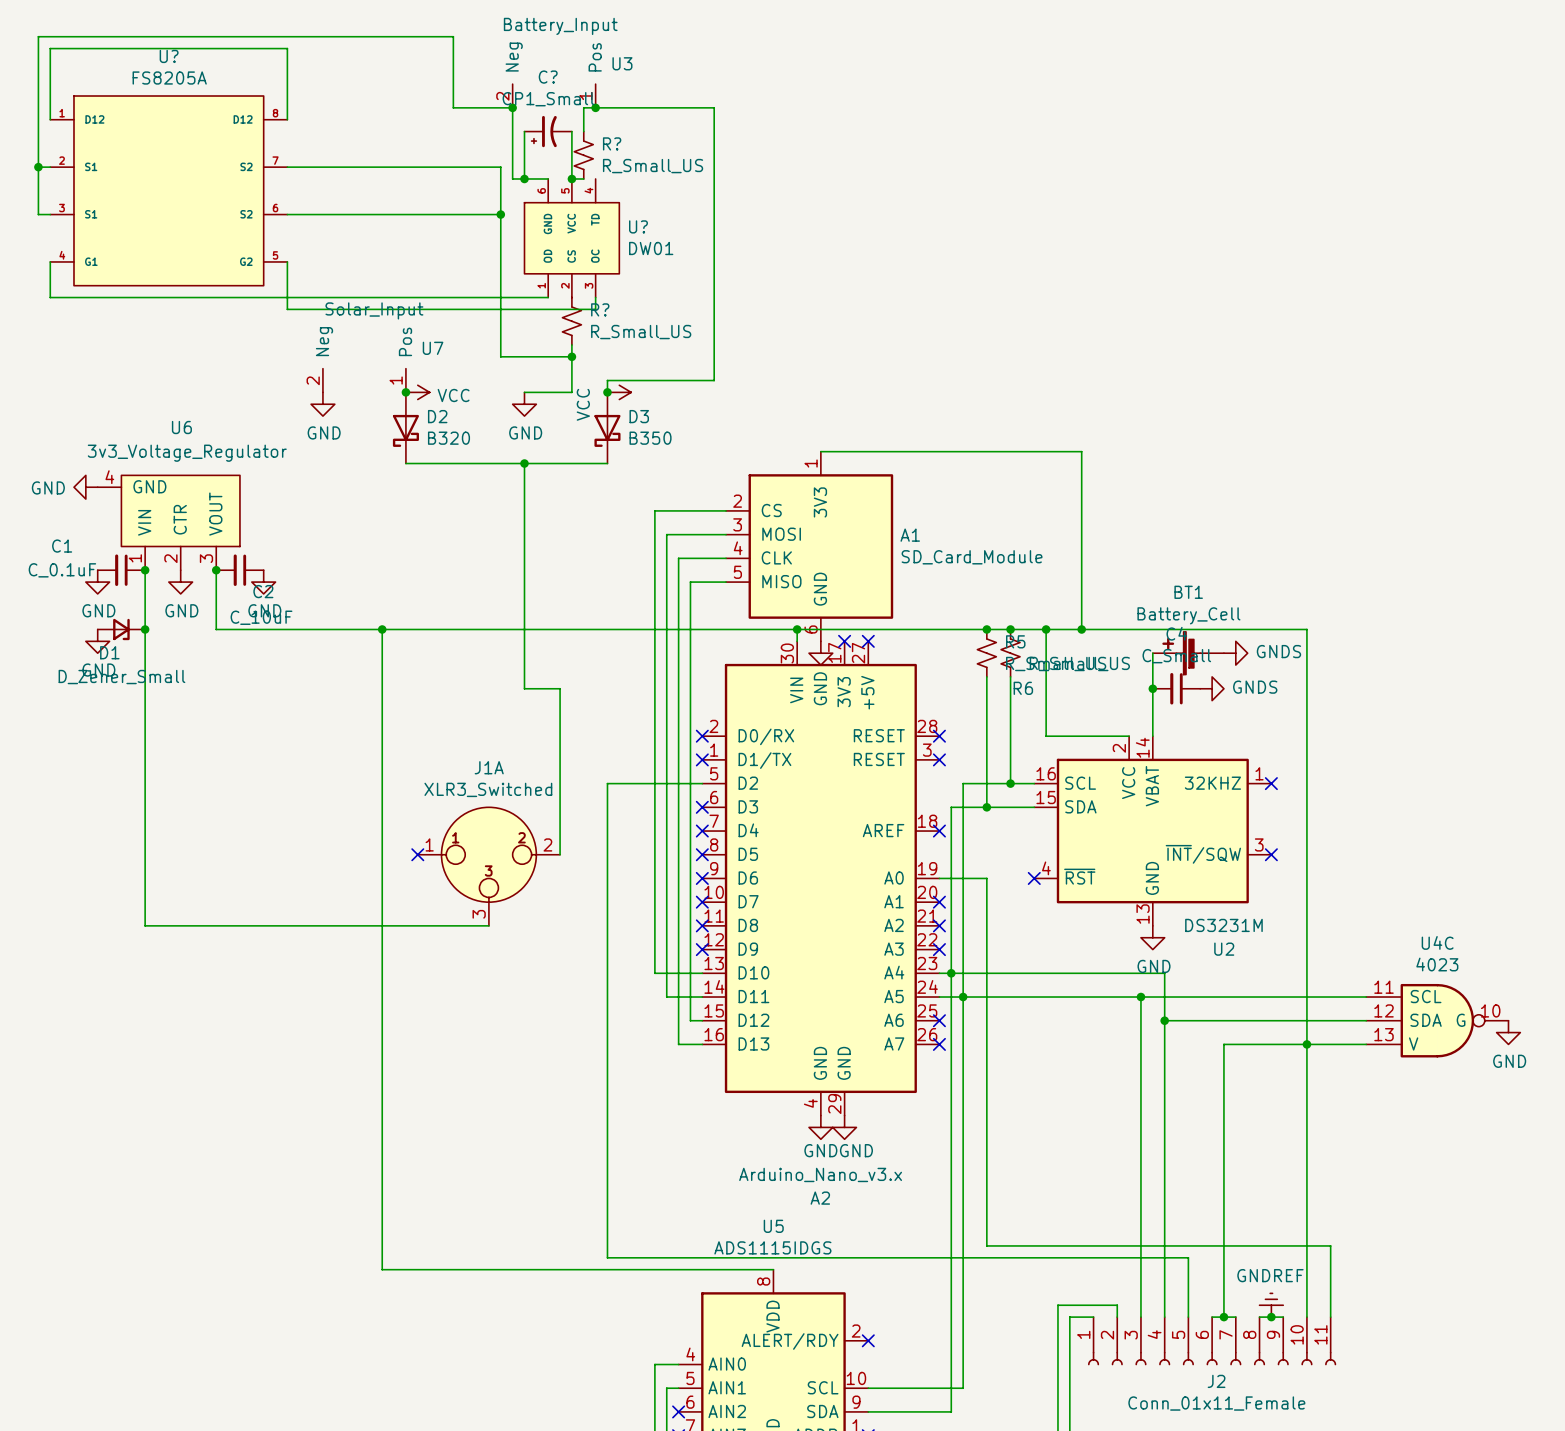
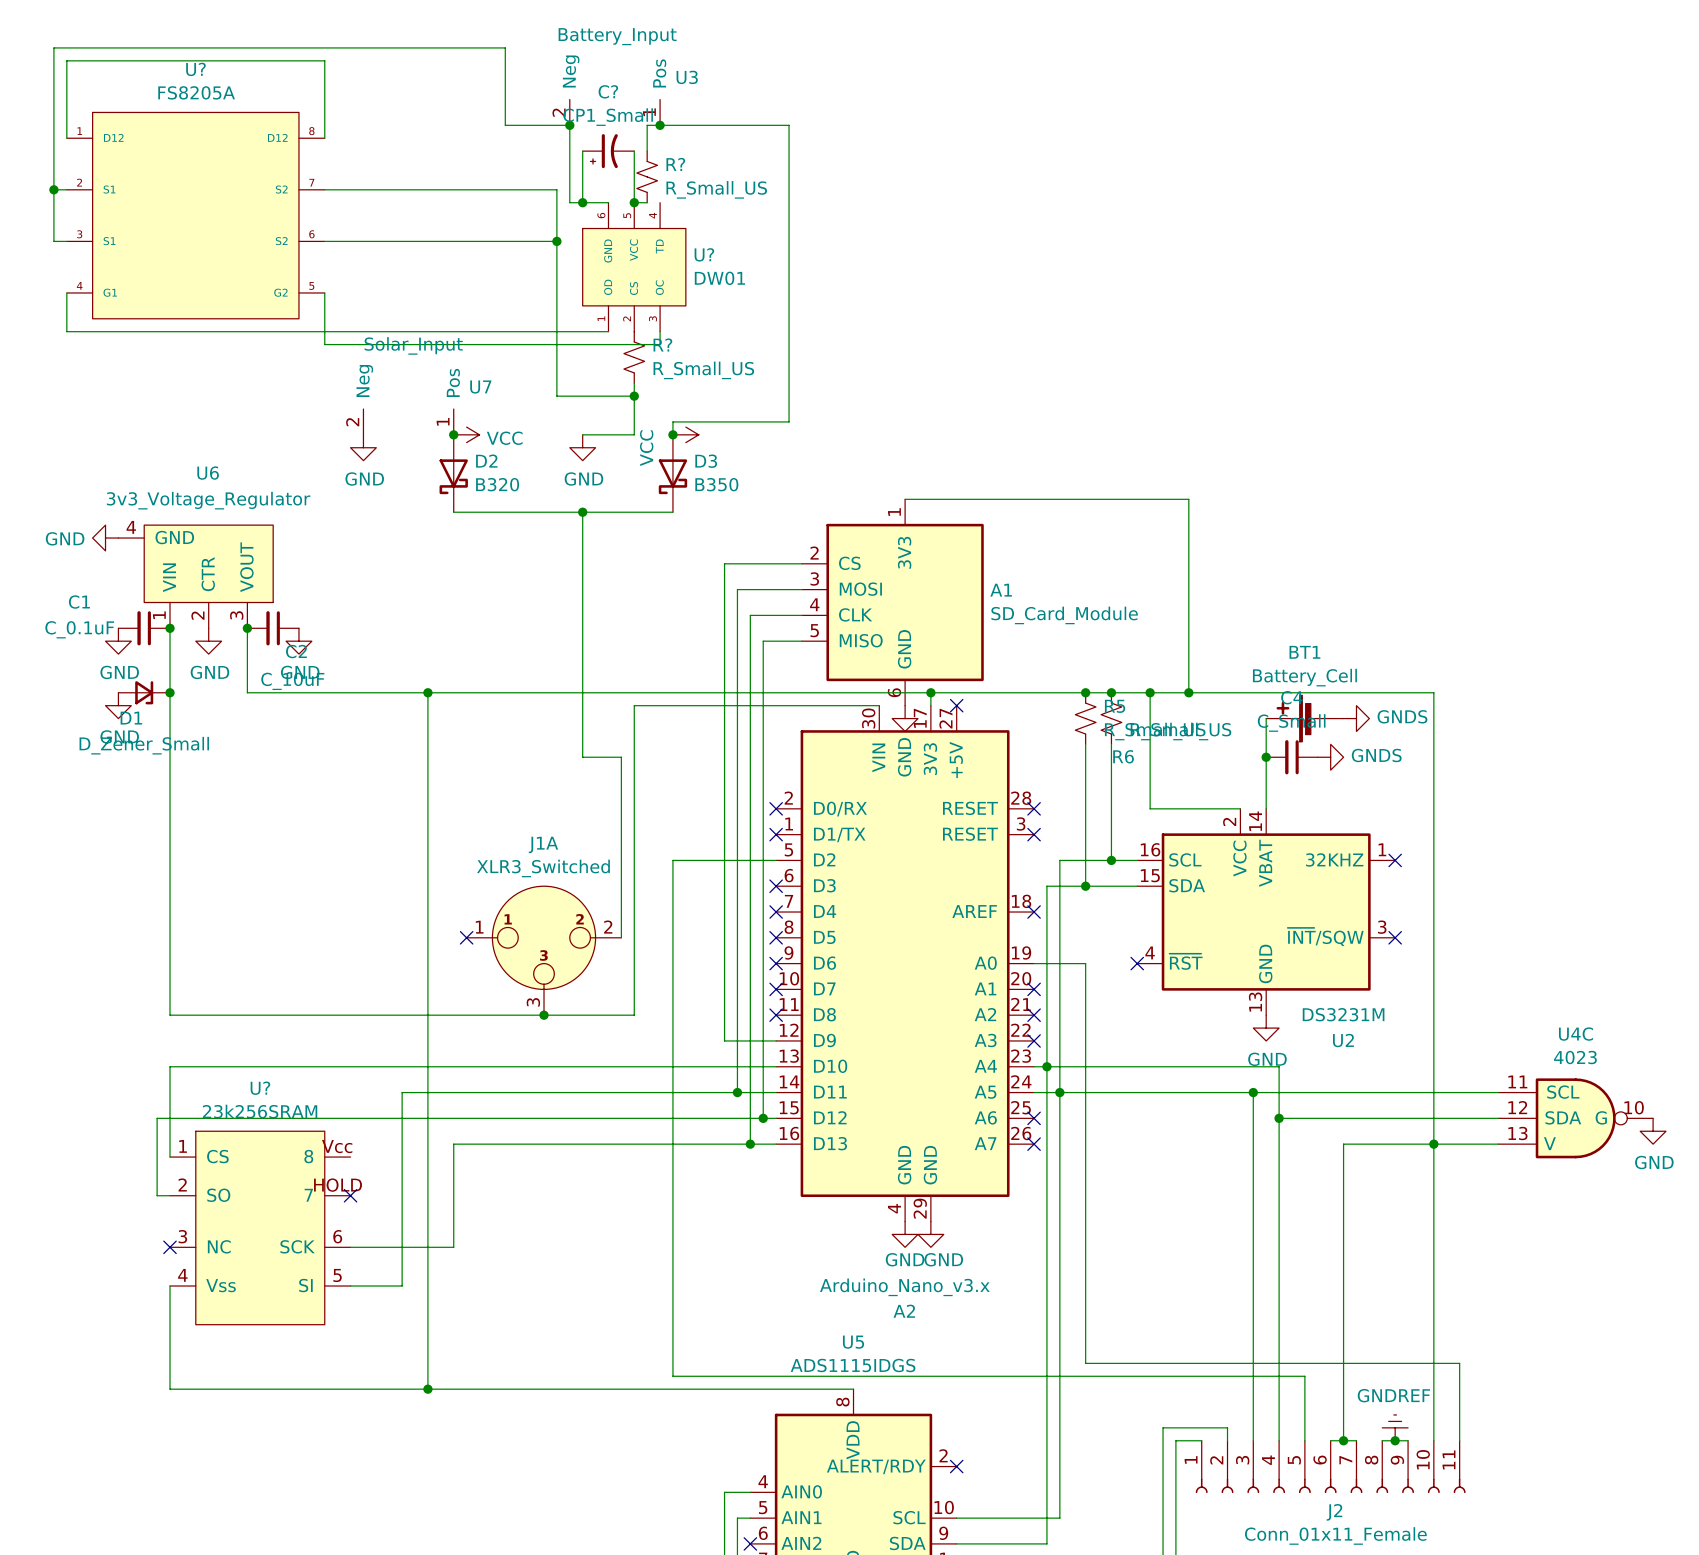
wire: (797, 629) (797, 641) -> (544, 1015) (634, 1015) (634, 705) (879, 705)
junction position: (797, 629) -> (930, 692)
wire: none -> (930, 692) (930, 705)
no-connect mark: (844, 641) -> none
junction: none -> (544, 1015)
wire: (654, 949) (654, 973) -> (724, 1040) (776, 1040)
no-connect mark: (702, 949) -> none
wire: none -> (724, 1066) (170, 1066) (170, 1157)
wire: none -> (737, 1092) (402, 1092) (402, 1286) (350, 1286)
junction: none -> (737, 1092)
wire: none -> (763, 1118) (157, 1118) (157, 1195) (170, 1195)
junction: none -> (763, 1118)
wire: none -> (750, 1144) (453, 1144) (453, 1247) (350, 1247)
junction: none -> (750, 1144)
no-connect mark: none -> (350, 1195)
U?: none -> 23k256SRAM (260, 1227)
no-connect mark: none -> (170, 1247)
wire: none -> (170, 1286) (170, 1389) (427, 1389)
junction: none -> (427, 1389)

